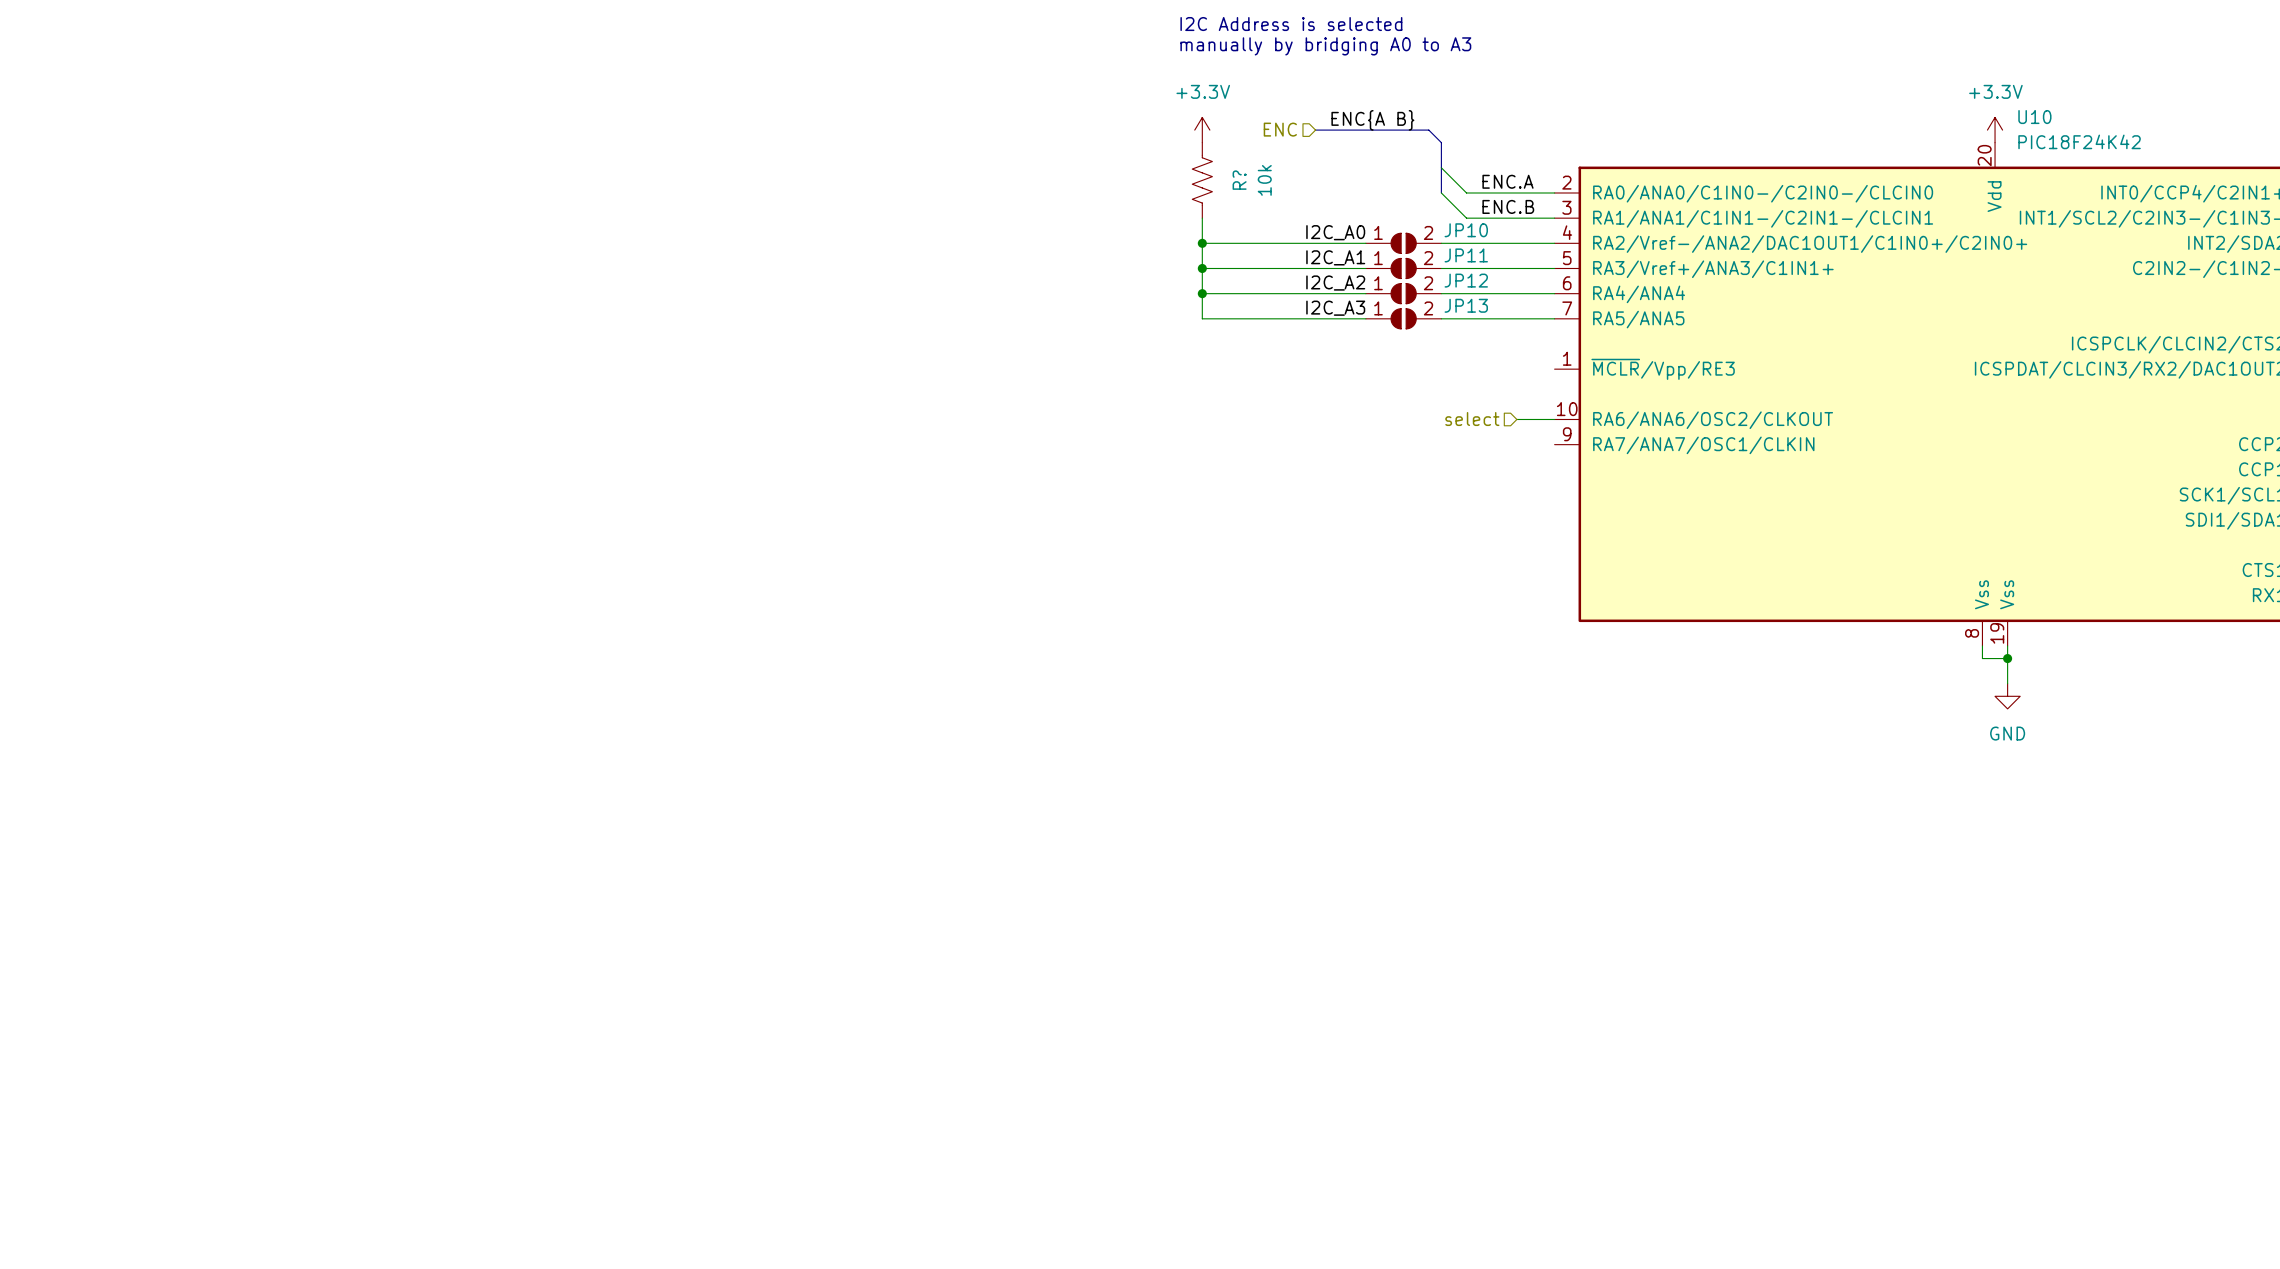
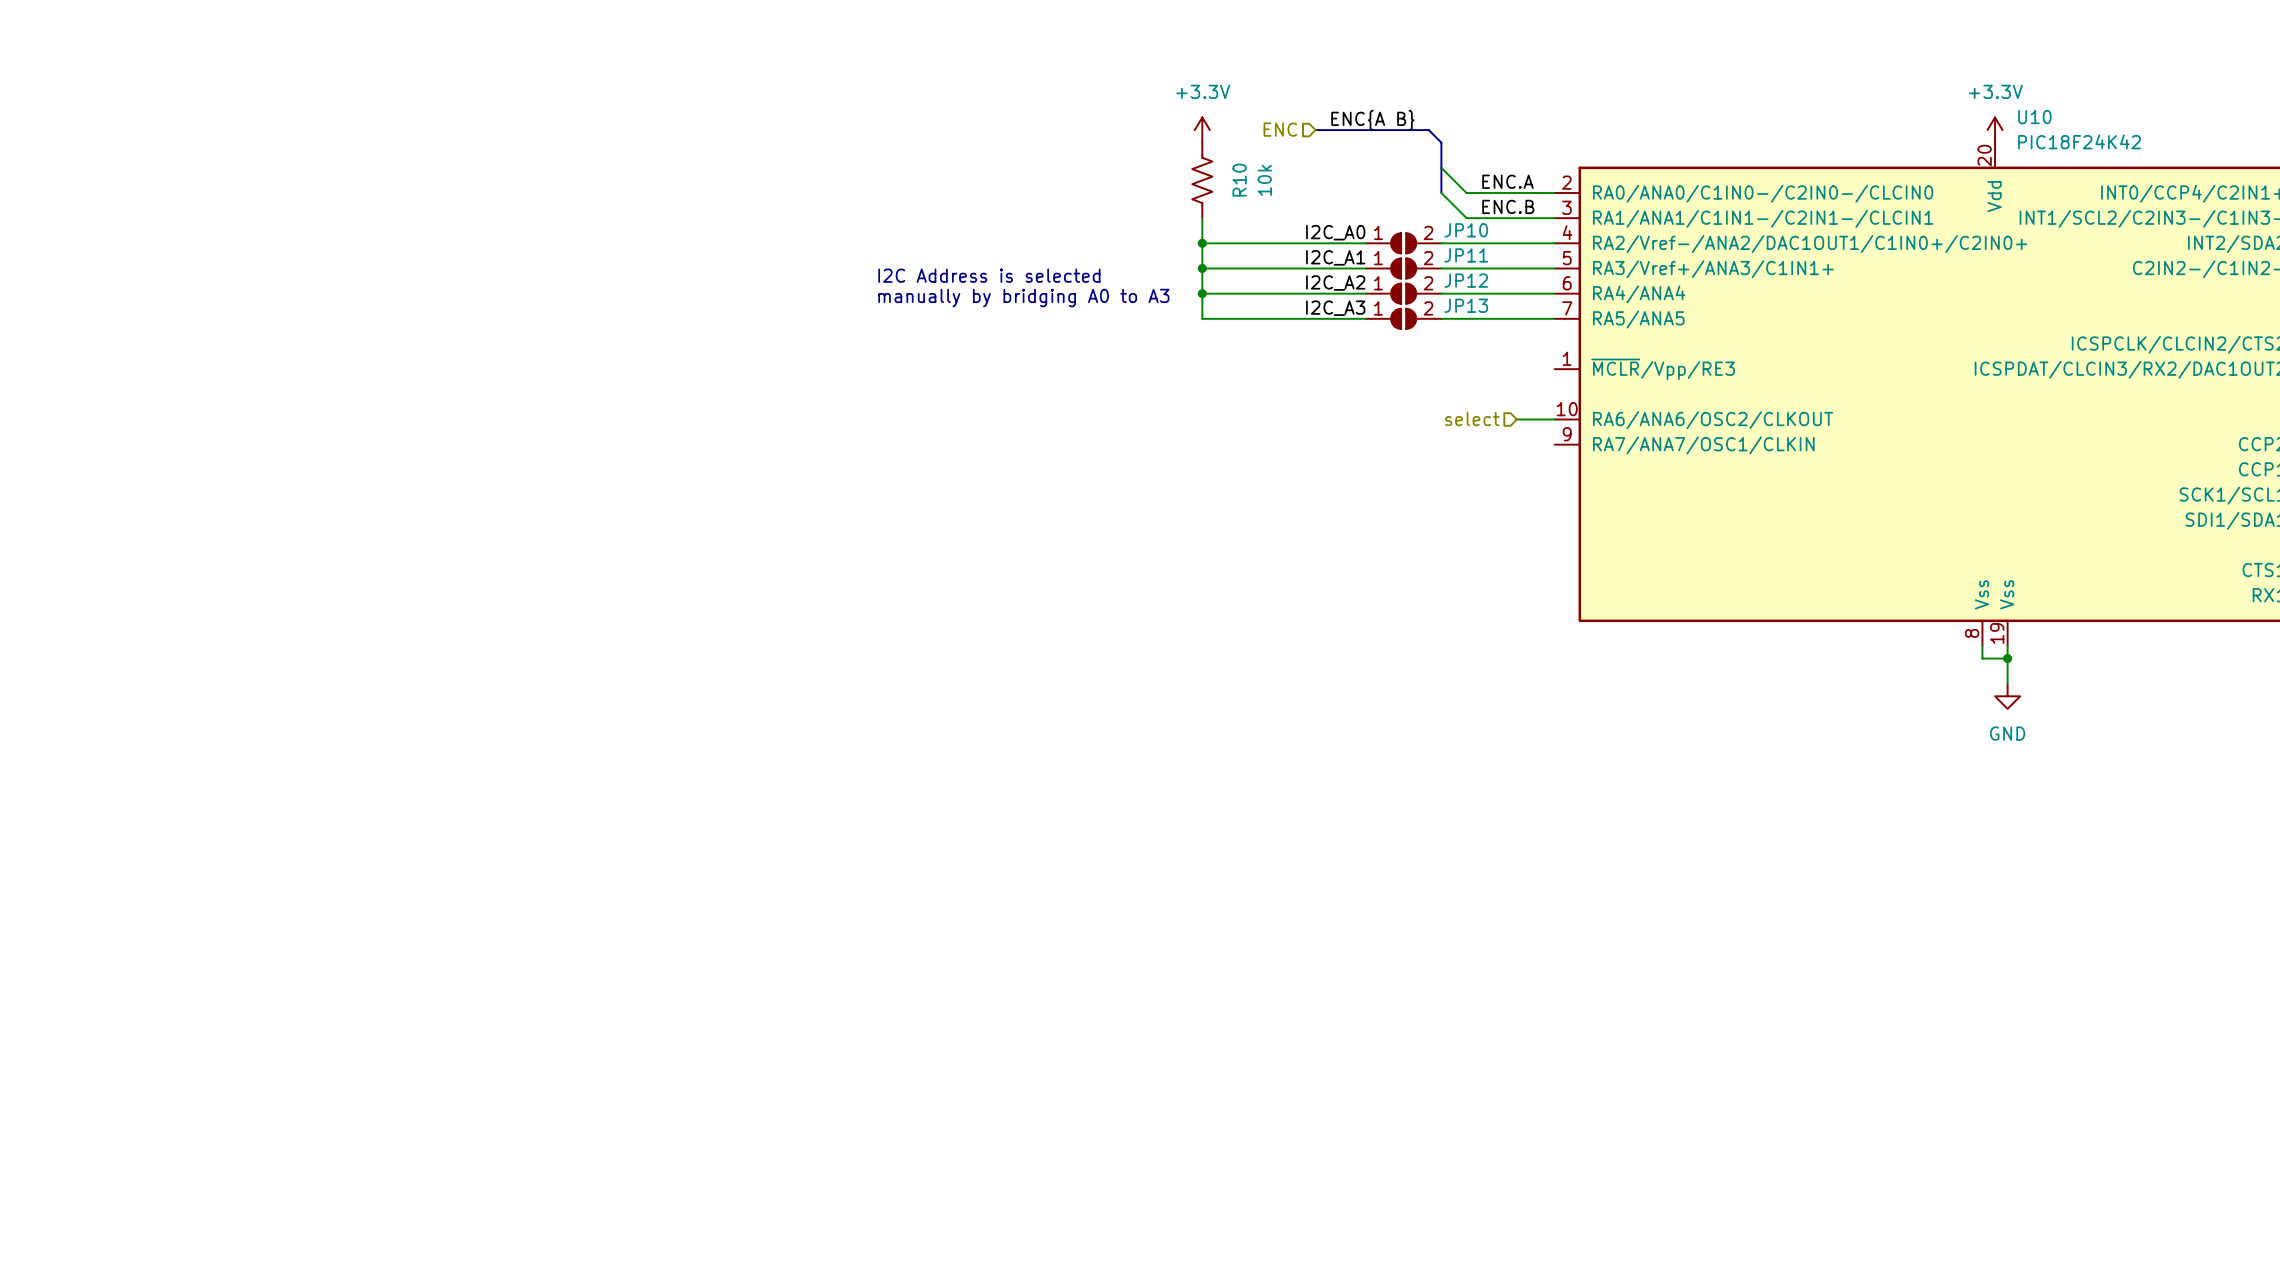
text: I2C Address is selected (1291, 24) -> none
text: manually by bridging A0 to A3 (1325, 46) -> none
R? name: R? (1239, 180) -> R10 (1239, 180)
text: none -> I2C Address is selected (989, 275)
text: none -> manually by bridging A0 to A3 (1023, 298)

